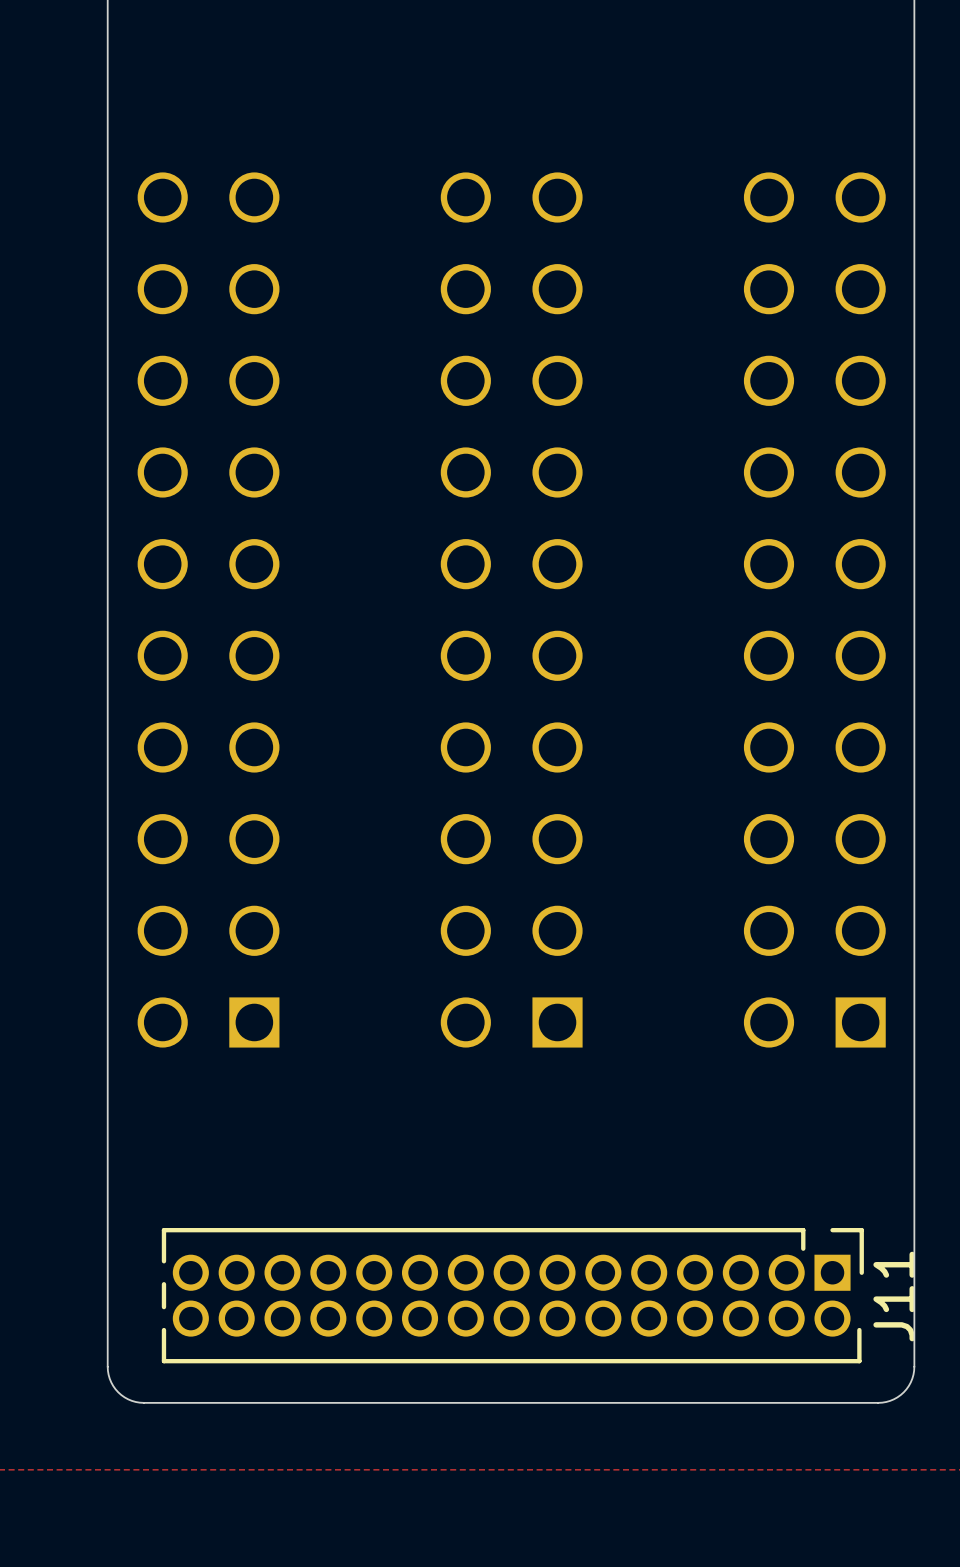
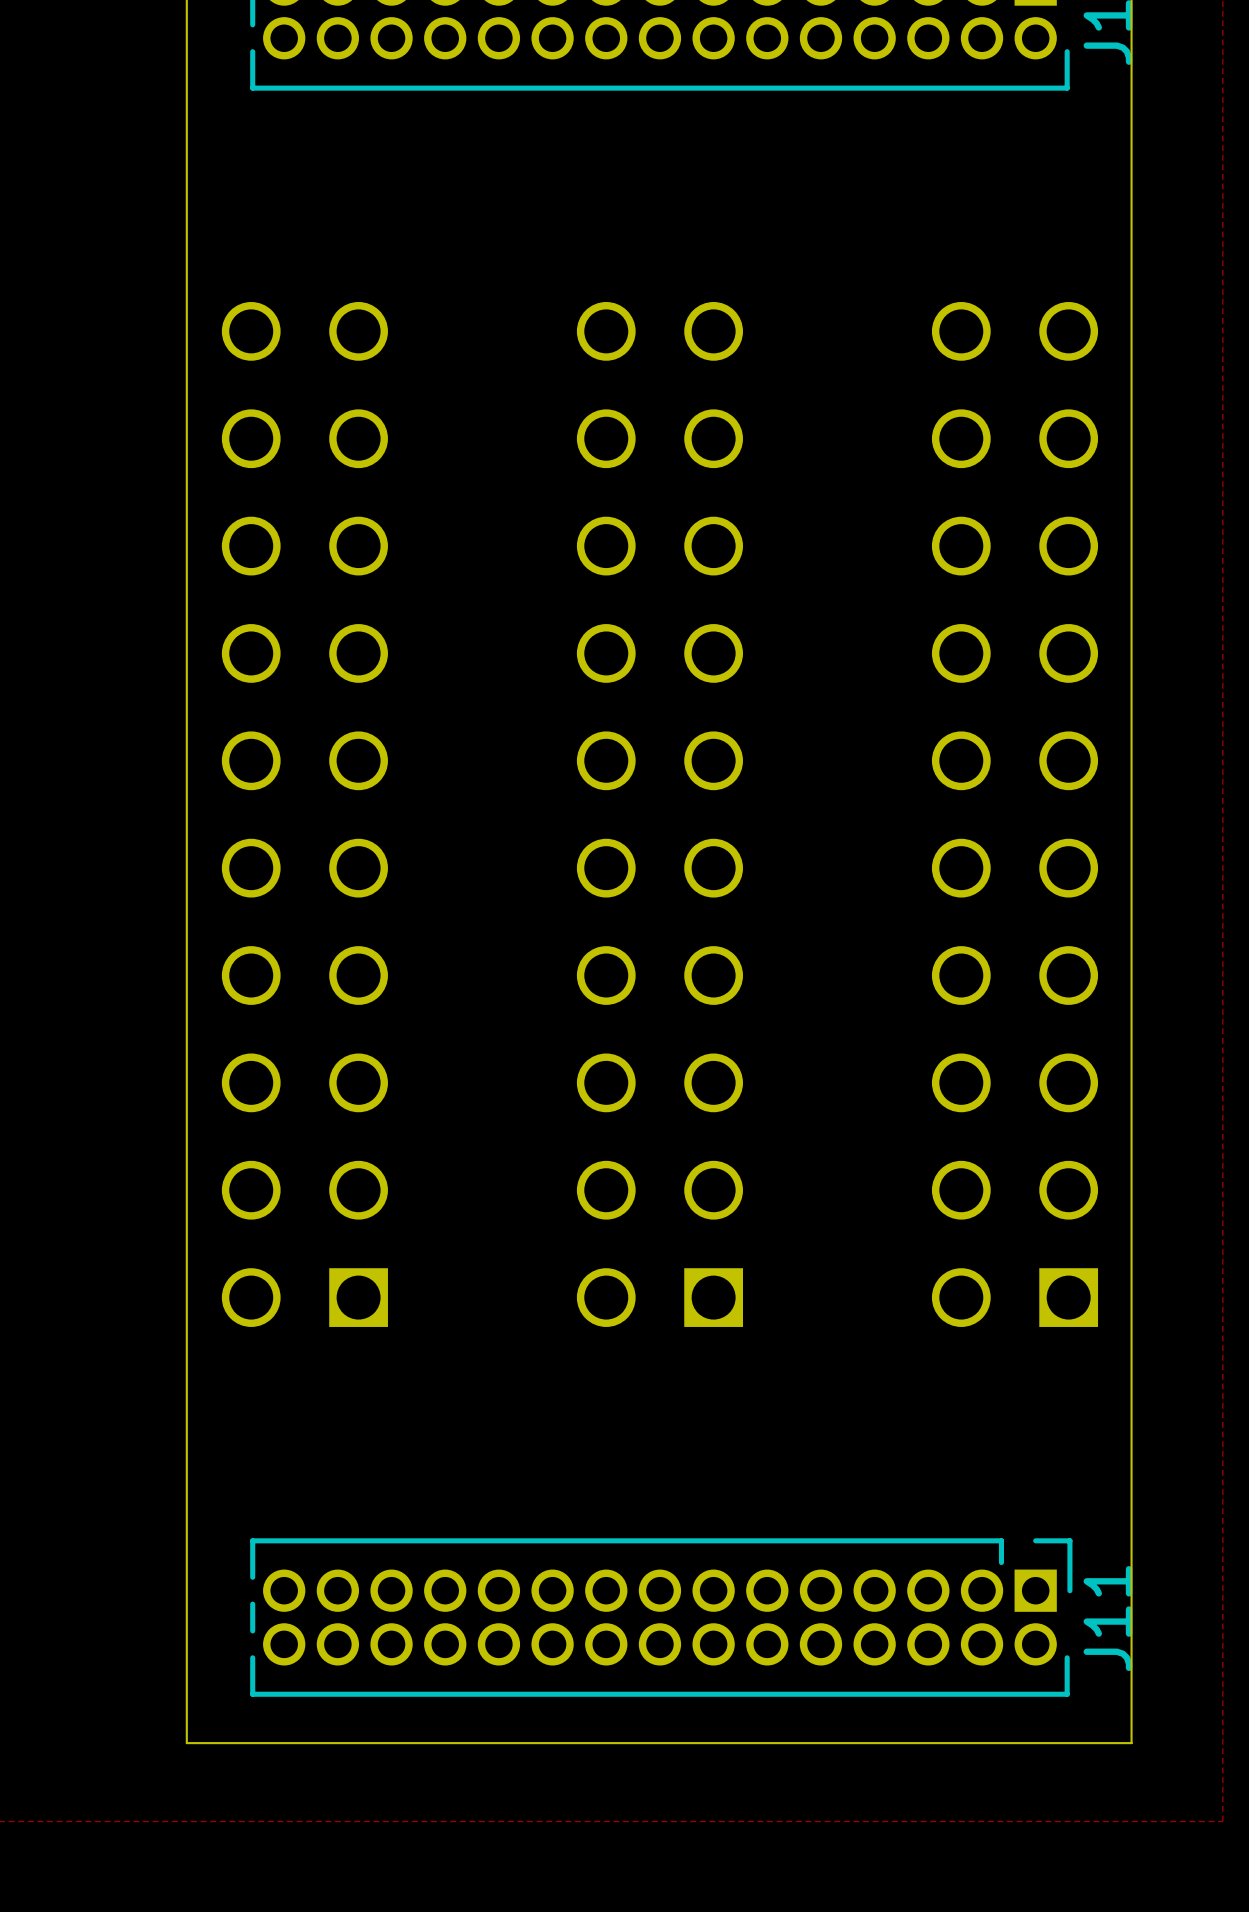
board edge: (107, 1366) (111, 1382) (118, 1392) (131, 1400) (143, 1402) -> (186, 1700) (186, 1743) (229, 1743)
board edge: (914, 1366) (912, 1378) (903, 1392) (890, 1400) (878, 1402) -> (1131, 1700) (1131, 1743) (1089, 1743)

